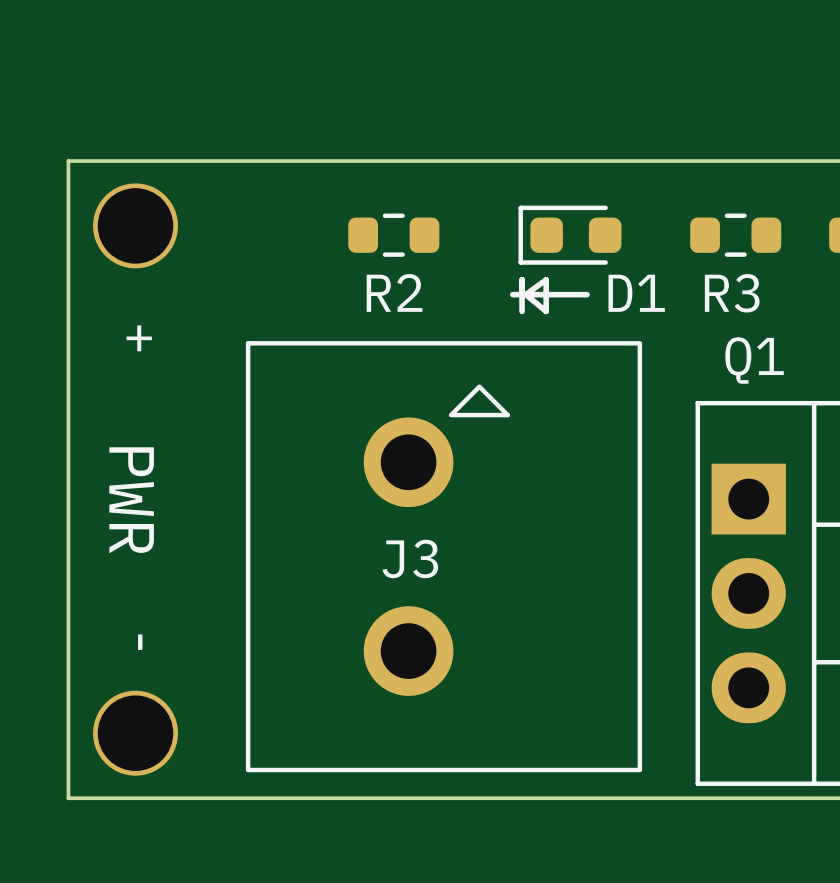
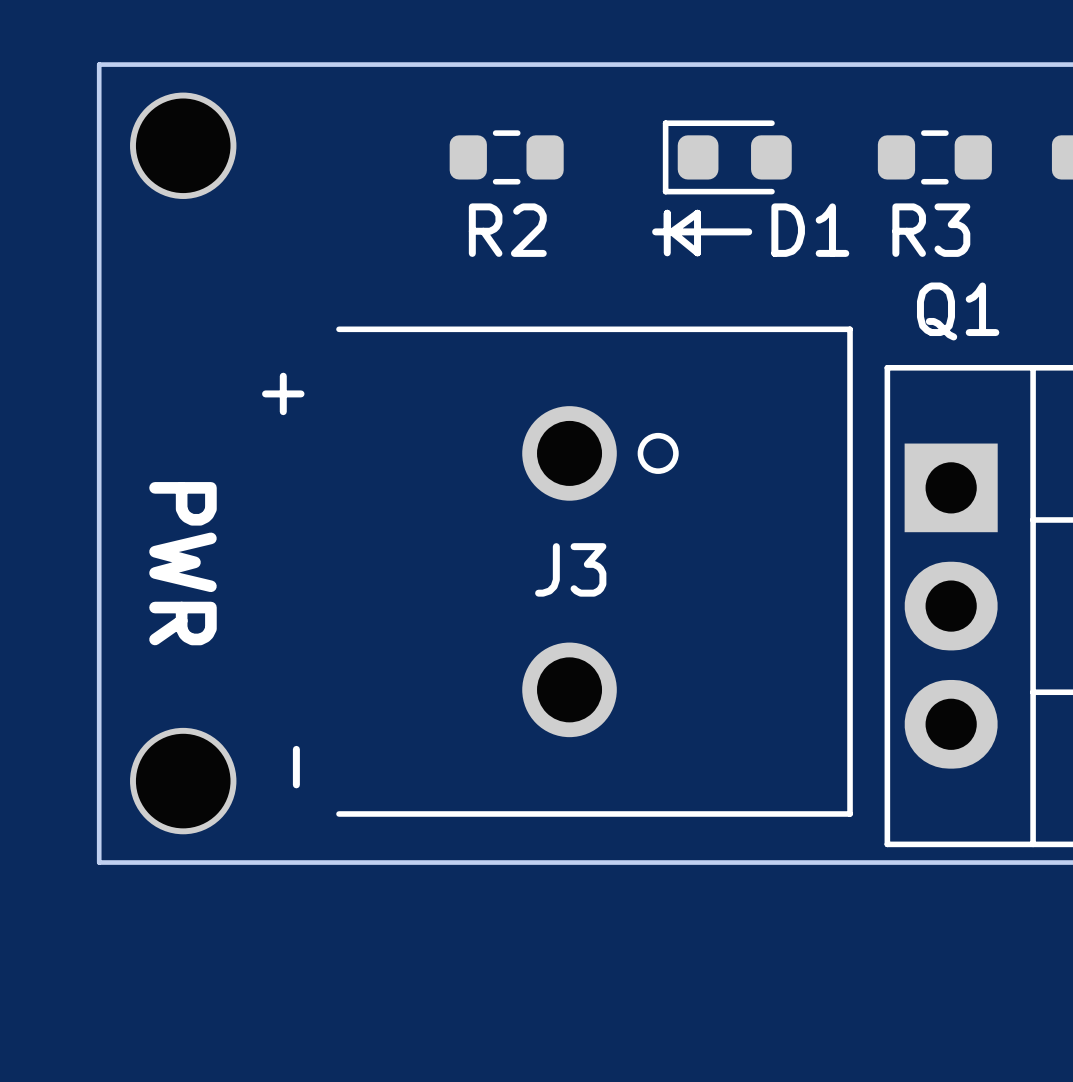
text position: + (139, 338) -> + (283, 393)
J3 footprint: [245, 341, 643, 773] -> [336, 326, 853, 817]
text position: PWR (131, 500) -> PWR (182, 563)
text position: - (140, 642) -> - (296, 767)

